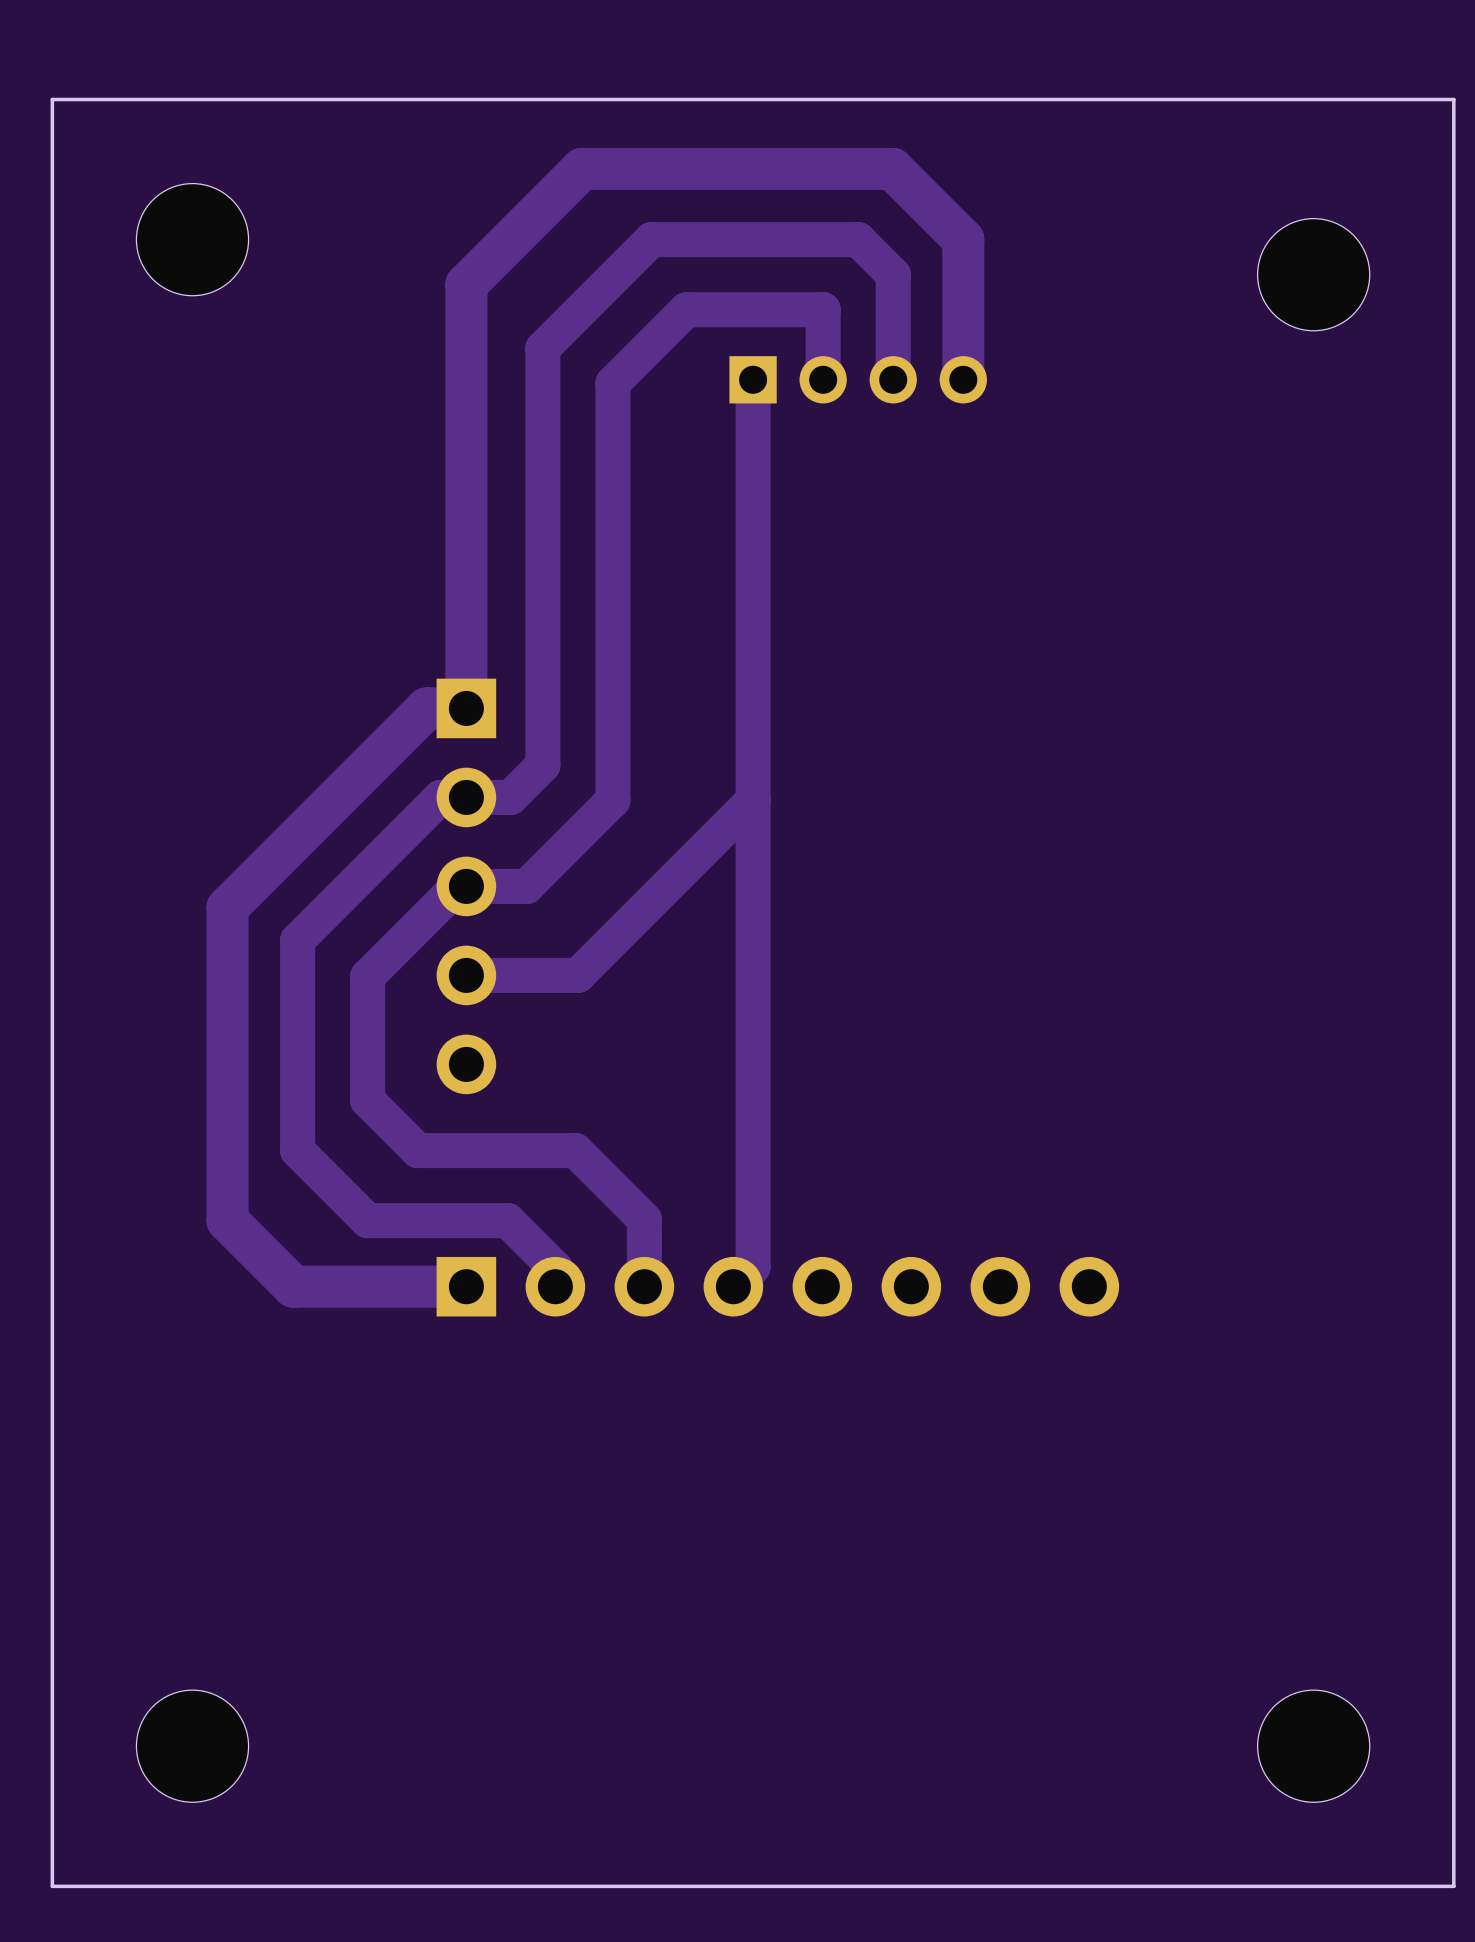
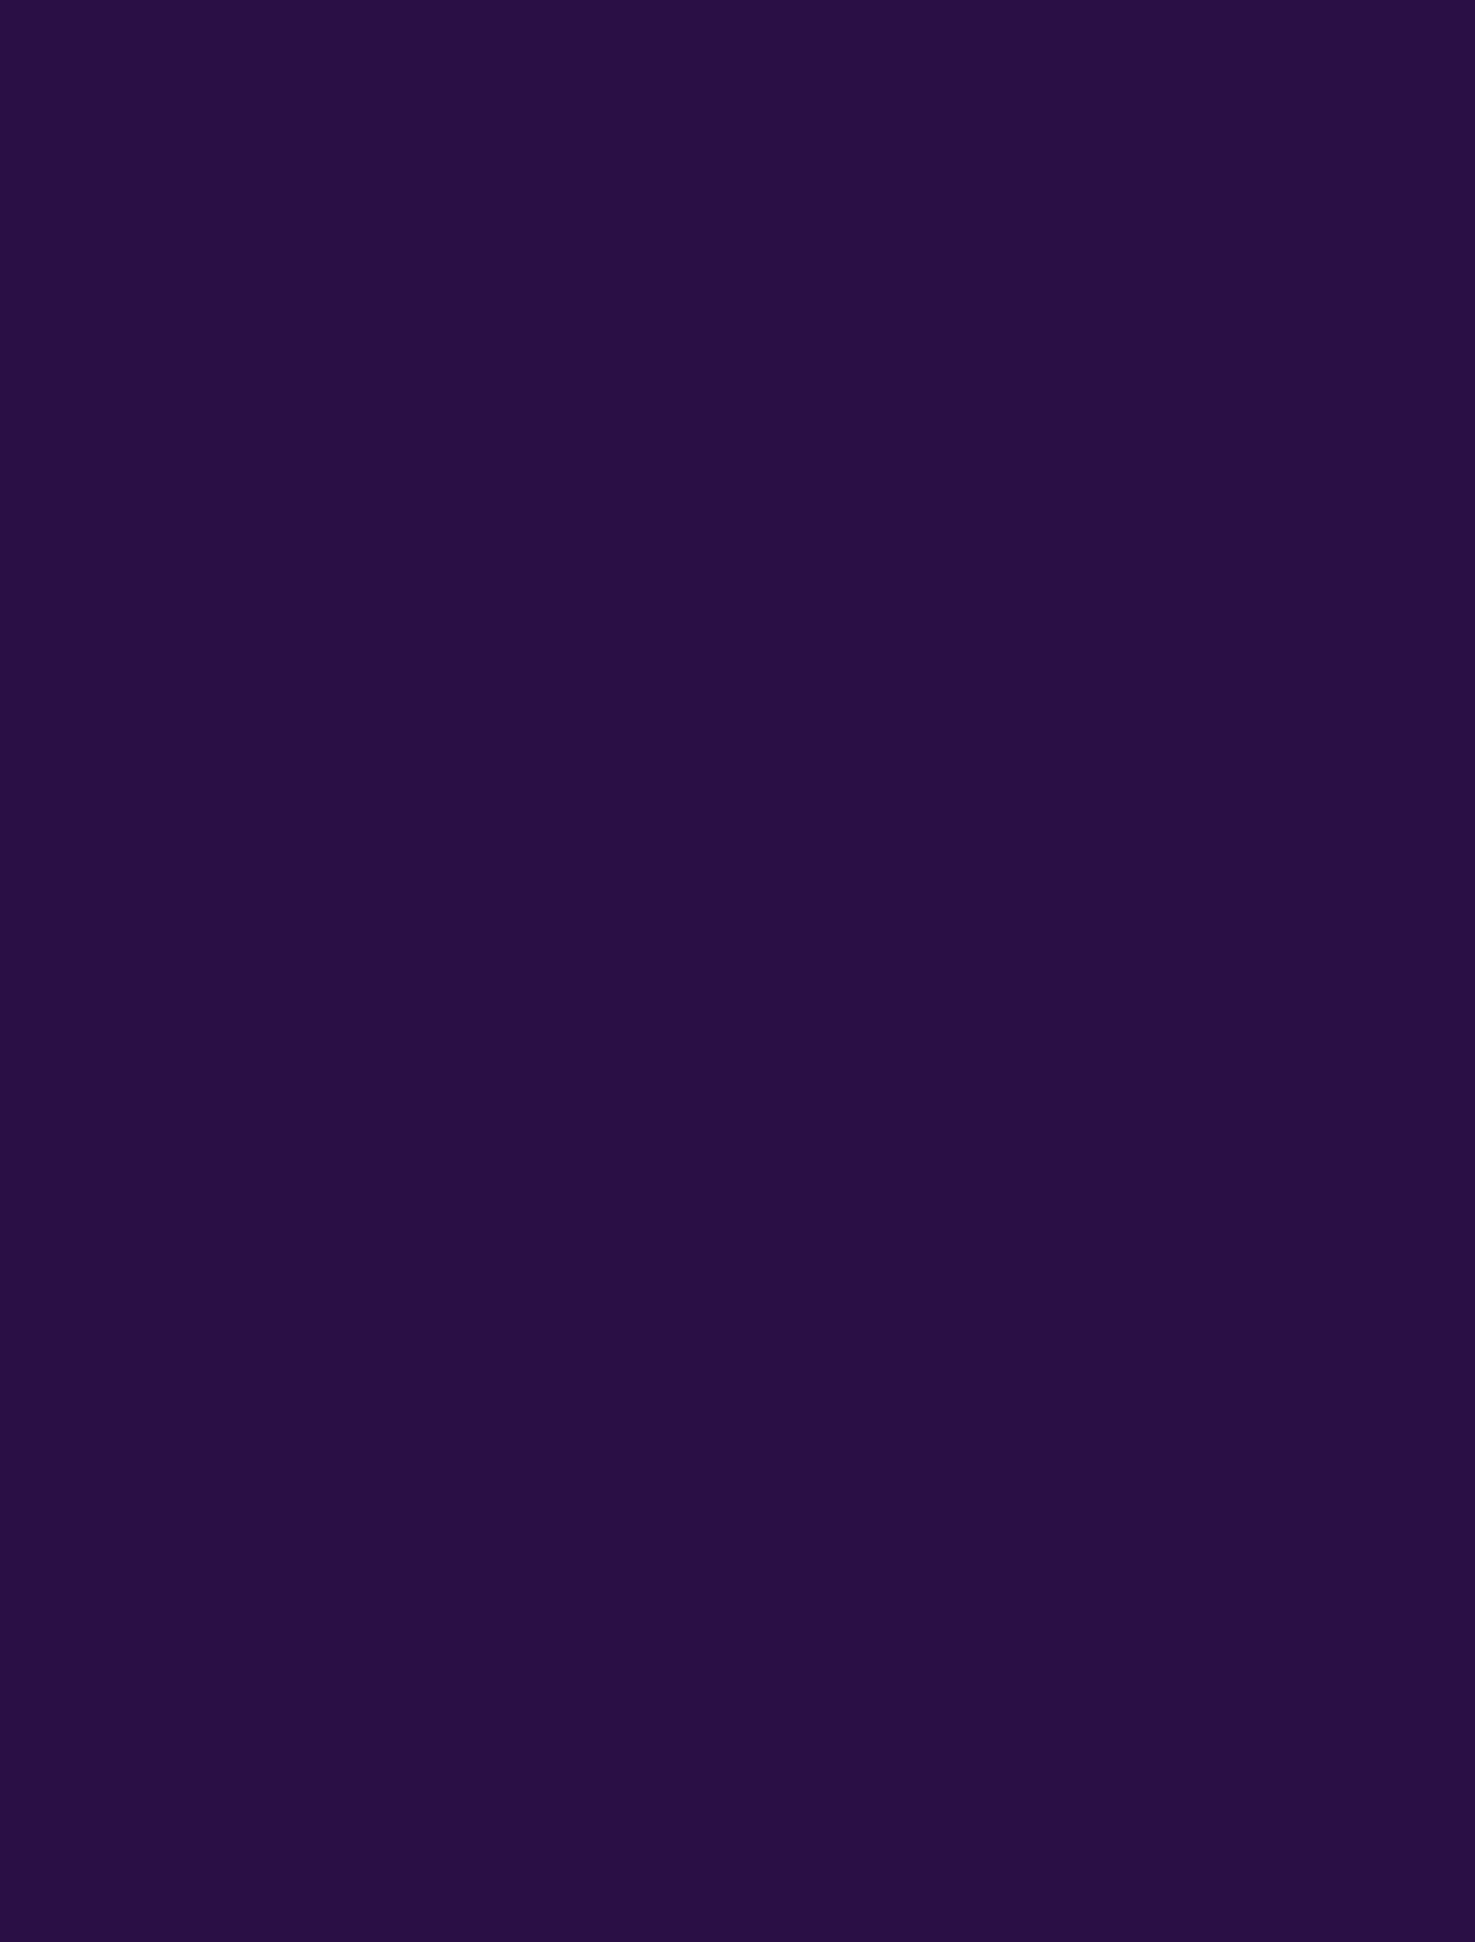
board edge: (1453, 99) (1453, 1886) (52, 1886) (52, 99) (1453, 99) -> none
part: (192, 239) -> none
part: (1313, 274) -> none
track: (753, 379) (753, 1267) (733, 1286) -> none
track: (823, 379) (823, 309) (686, 309) (612, 383) (612, 800) (526, 886) (457, 886) (367, 976) (367, 1100) (417, 1150) (575, 1150) (644, 1219) (644, 1286) -> none
part: (858, 379) -> none
track: (893, 379) (893, 274) (858, 239) (651, 239) (542, 348) (542, 765) (510, 797) (440, 797) (297, 940) (297, 1150) (367, 1220) (507, 1220) (555, 1268) (555, 1286) -> none
track: (963, 379) (963, 239) (892, 168) (582, 168) (466, 284) (466, 708) (426, 708) (227, 907) (227, 1220) (293, 1286) (466, 1286) -> none
track: (753, 800) (577, 975) (466, 975) -> none
part: (466, 886) -> none
part: (777, 1286) -> none
part: (192, 1746) -> none
part: (1313, 1746) -> none

